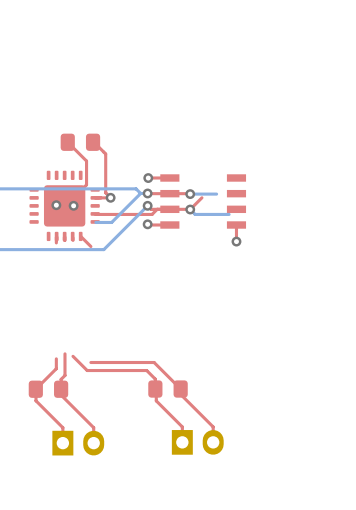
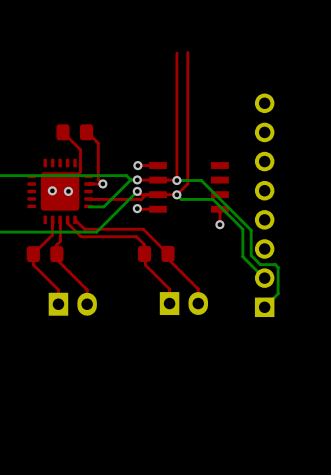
top track: none -> (187, 52) (187, 183)
top track: none -> (176, 53) (176, 180)
bottom track: none -> (201, 180) (251, 230) (251, 255) (260, 264) (275, 264) (278, 267) (278, 293) (265, 306)
bottom track: none -> (213, 199) (242, 229) (242, 256) (264, 278)
part: none -> (264, 205)
top track: none -> (60, 223) (60, 241) (56, 244) (56, 254)
part: none -> (45, 254)
part: none -> (156, 253)
part: none -> (183, 303)
part: none -> (72, 304)
top track: (64, 353) (64, 375) (61, 379) (61, 389) -> none
top track: (73, 356) (87, 370) (146, 370) (155, 379) (155, 389) -> (67, 223) (81, 236) (136, 236) (144, 244) (144, 253)
top track: (56, 358) (56, 368) (35, 389) -> (52, 225) (52, 235) (33, 254)
top track: (90, 362) (154, 362) (180, 389) -> (84, 229) (143, 229) (168, 253)
part: (48, 389) -> none
top track: (60, 389) (60, 394) (93, 427) (93, 443) -> (56, 254) (56, 259) (87, 289) (87, 304)
top track: (156, 389) (156, 400) (182, 426) (182, 442) -> (145, 254) (145, 264) (169, 289) (169, 303)
part: (168, 389) -> none
top track: (180, 389) (180, 394) (213, 426) (213, 442) -> (167, 254) (167, 258) (198, 289) (198, 303)
top track: (35, 391) (35, 400) (62, 427) (62, 443) -> (33, 256) (33, 264) (58, 289) (58, 304)
part: (197, 442) -> none
part: (78, 443) -> none

